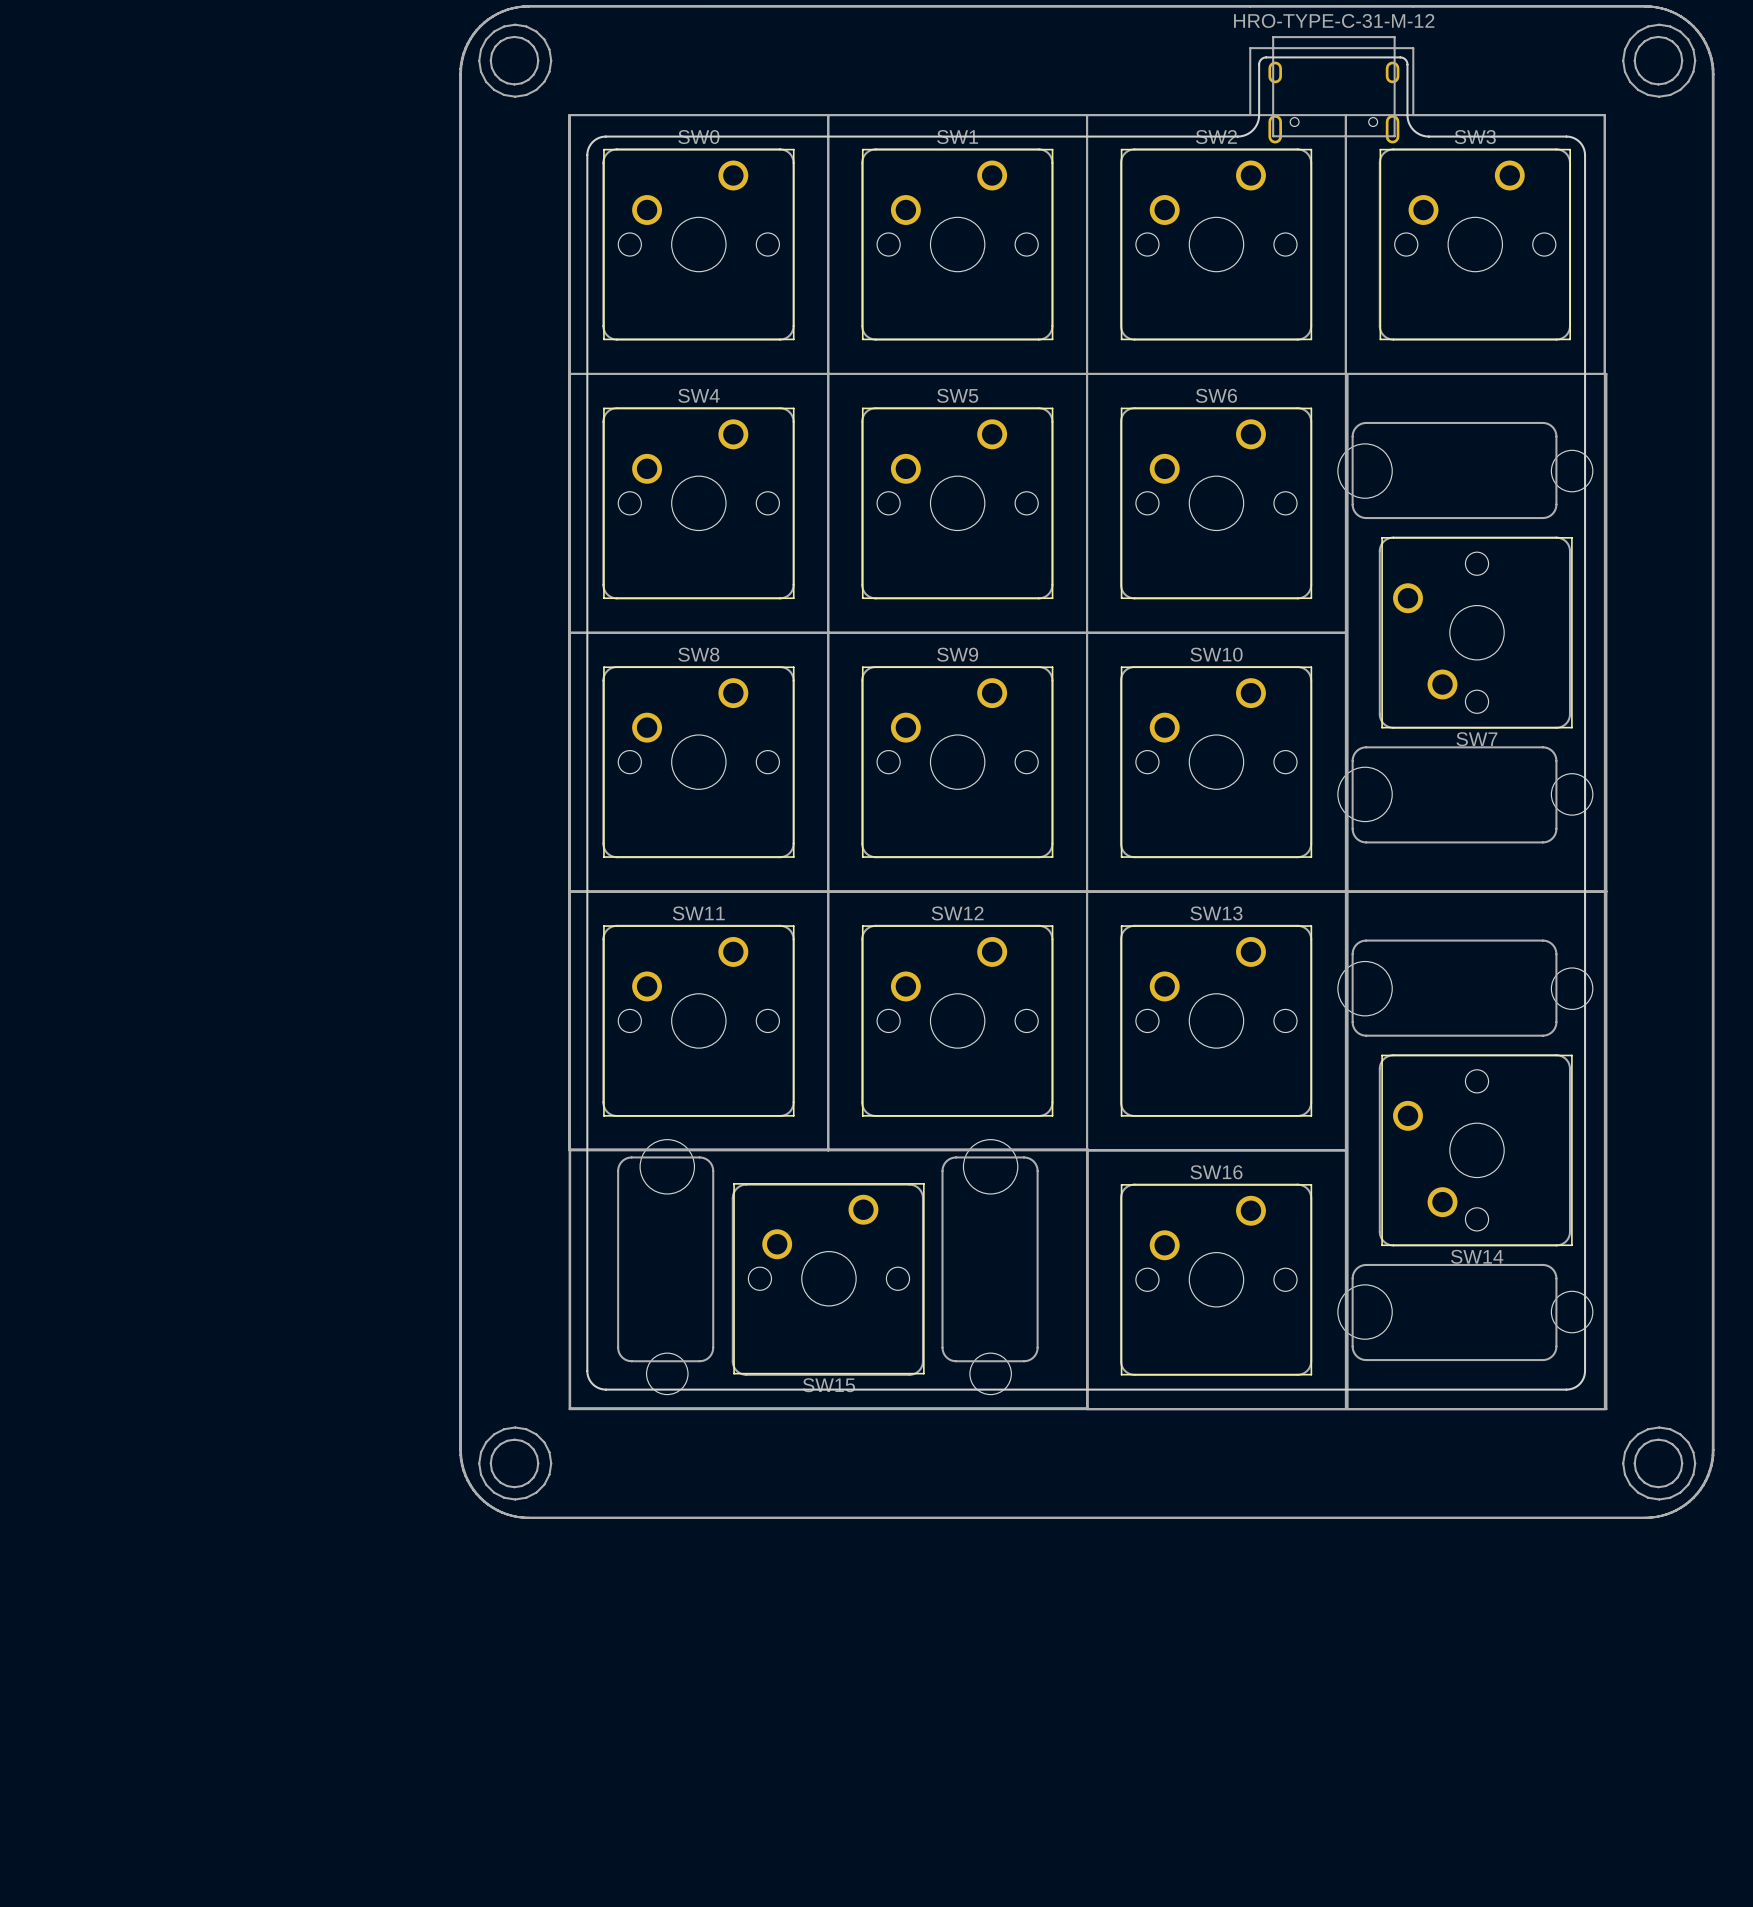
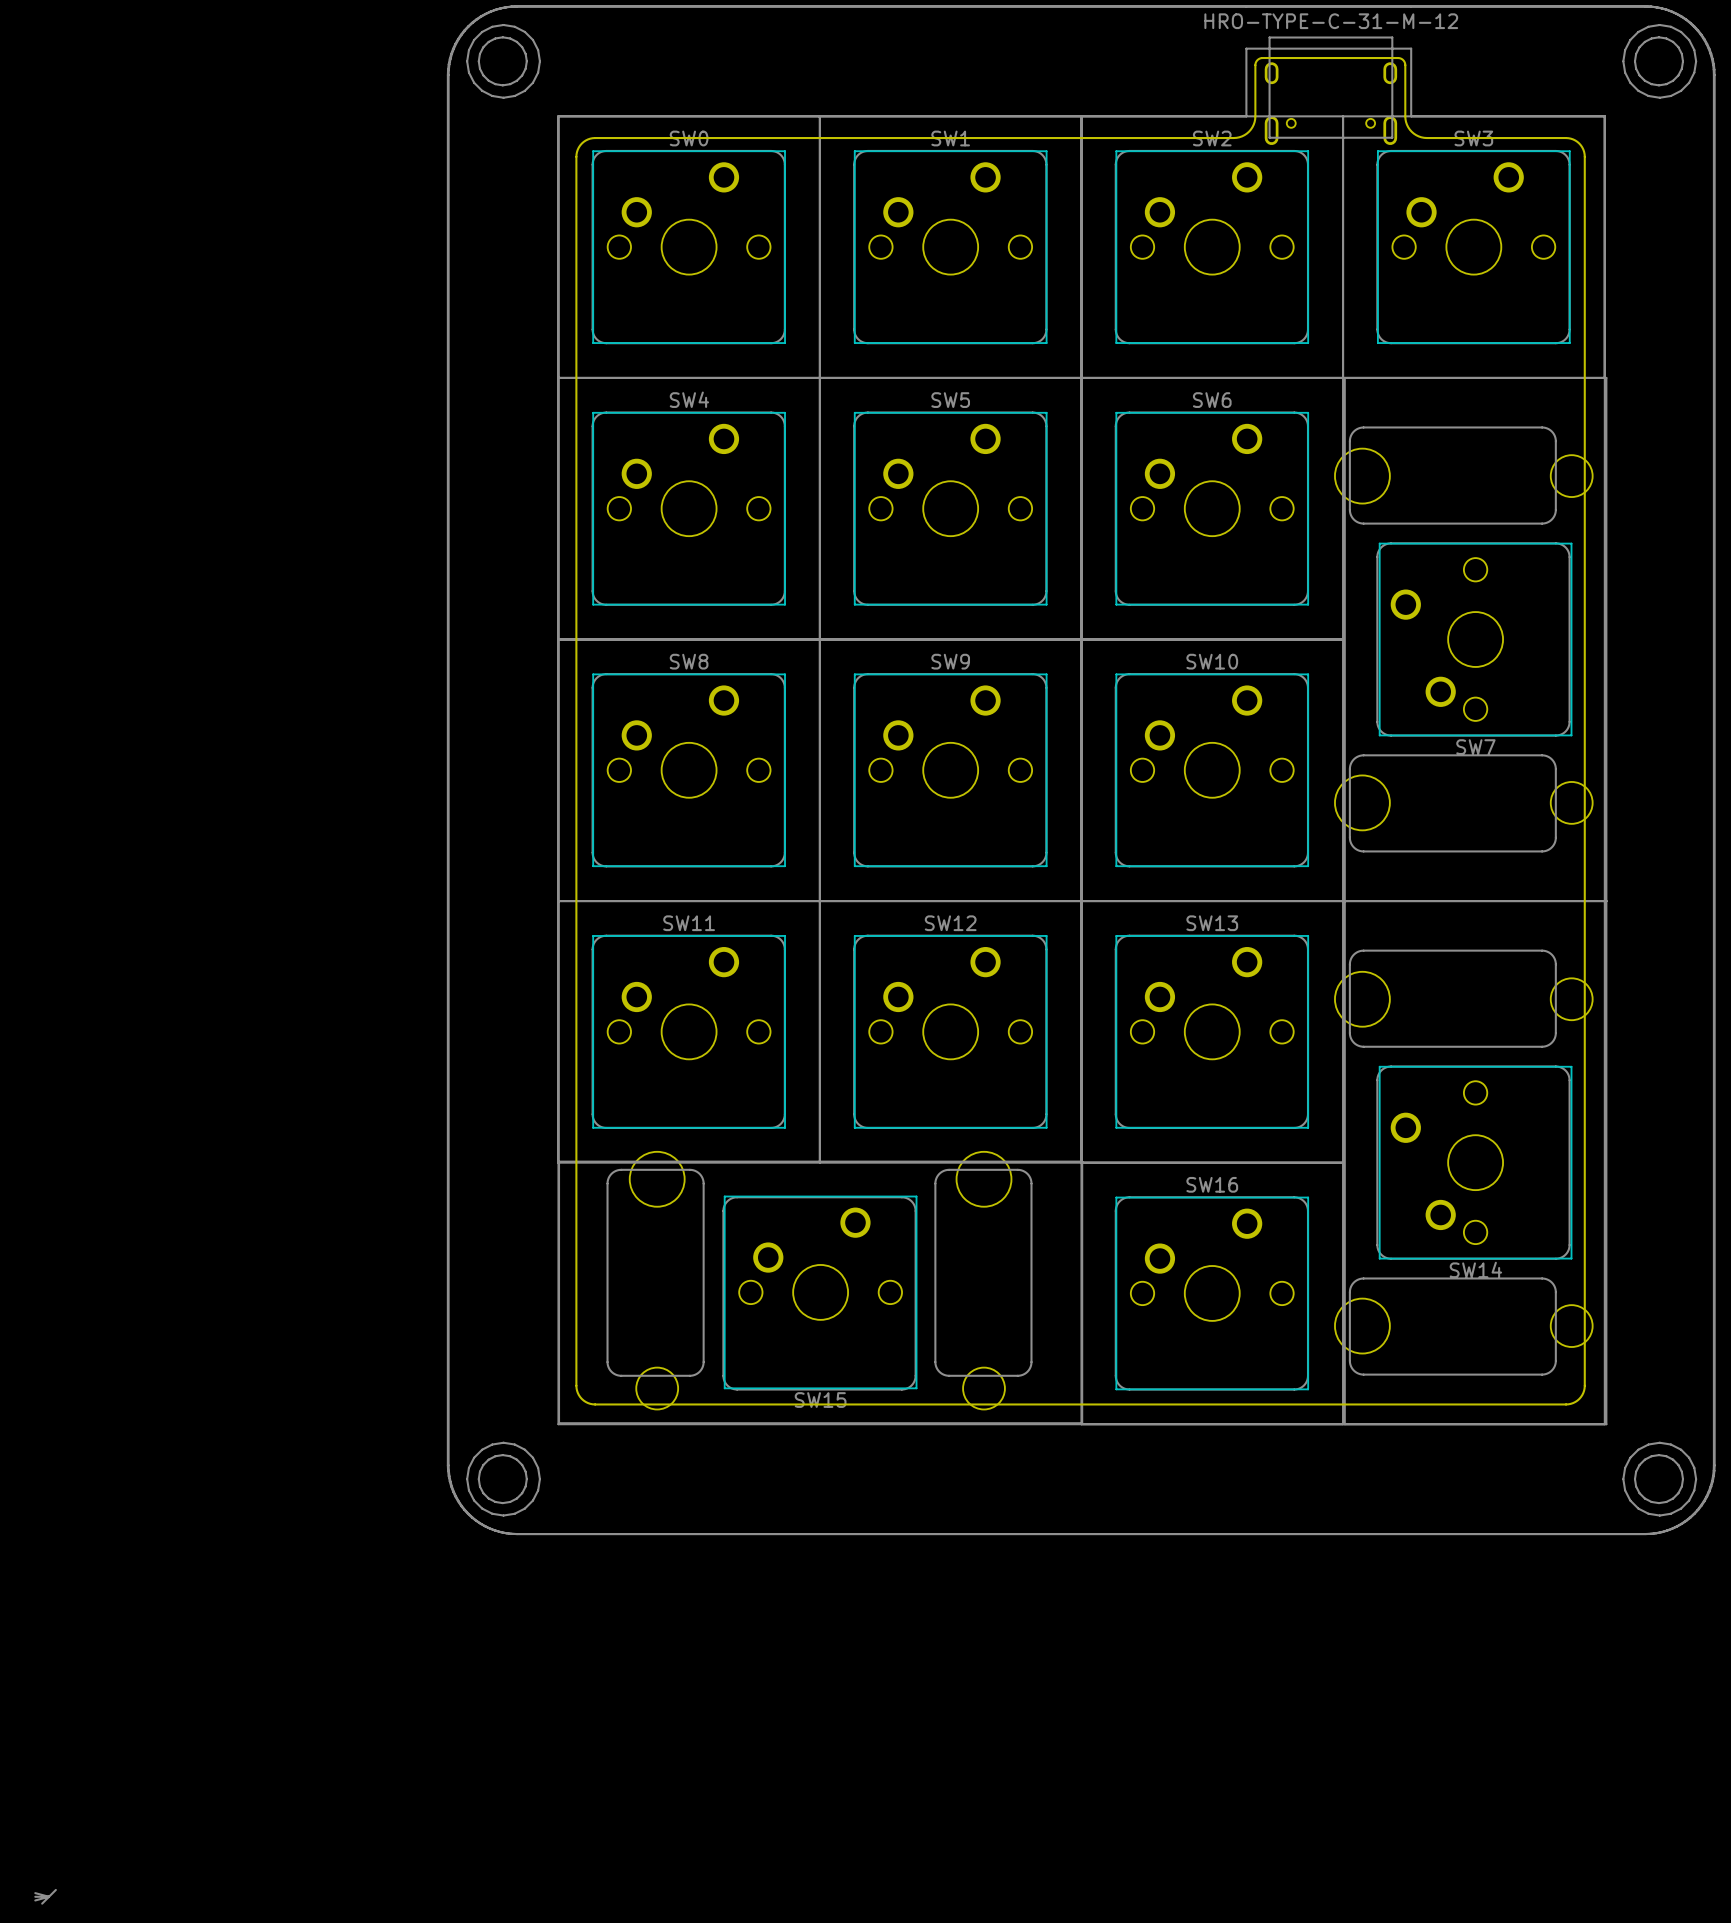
line: none -> (55, 1889) (42, 1903)
line: none -> (35, 1893) (49, 1896)
line: none -> (35, 1896) (49, 1896)
line: none -> (49, 1896) (35, 1900)

